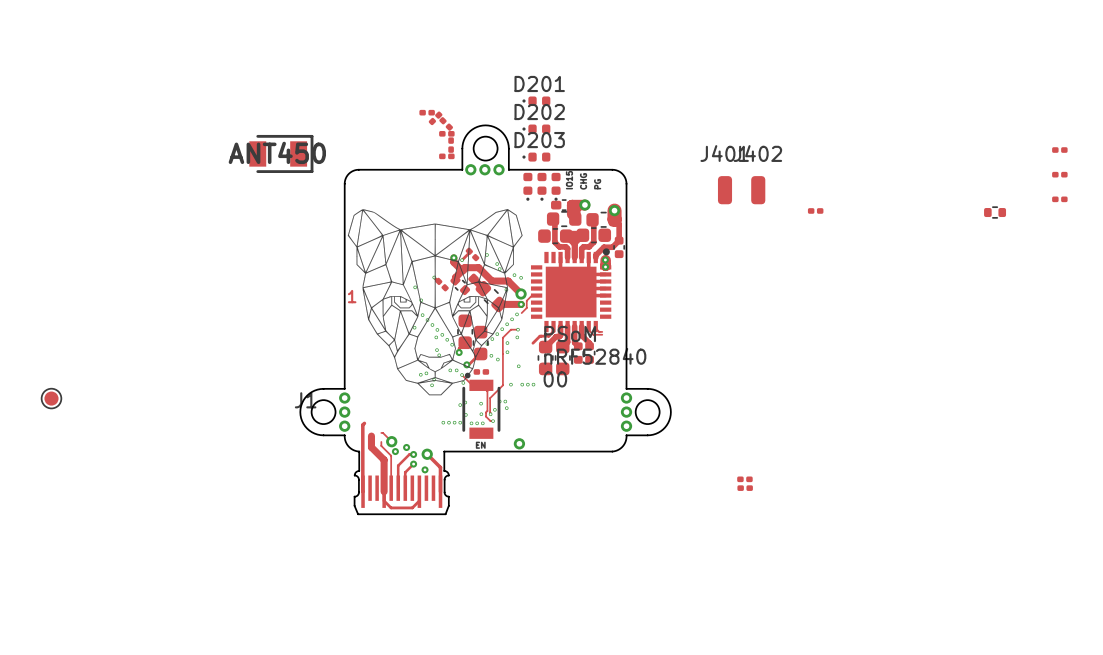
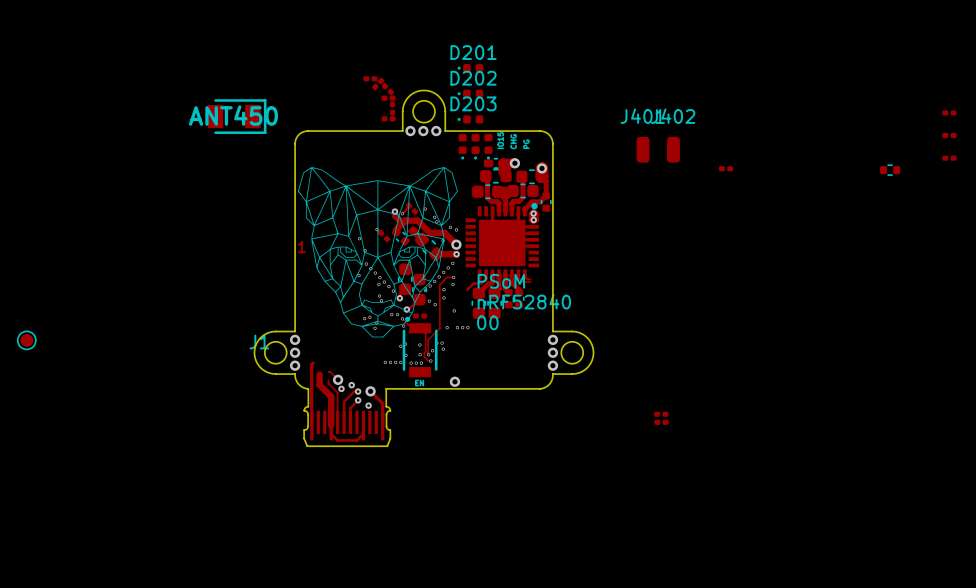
track: (536, 295) (531, 295) (526, 300) (526, 307) (521, 313) -> none

